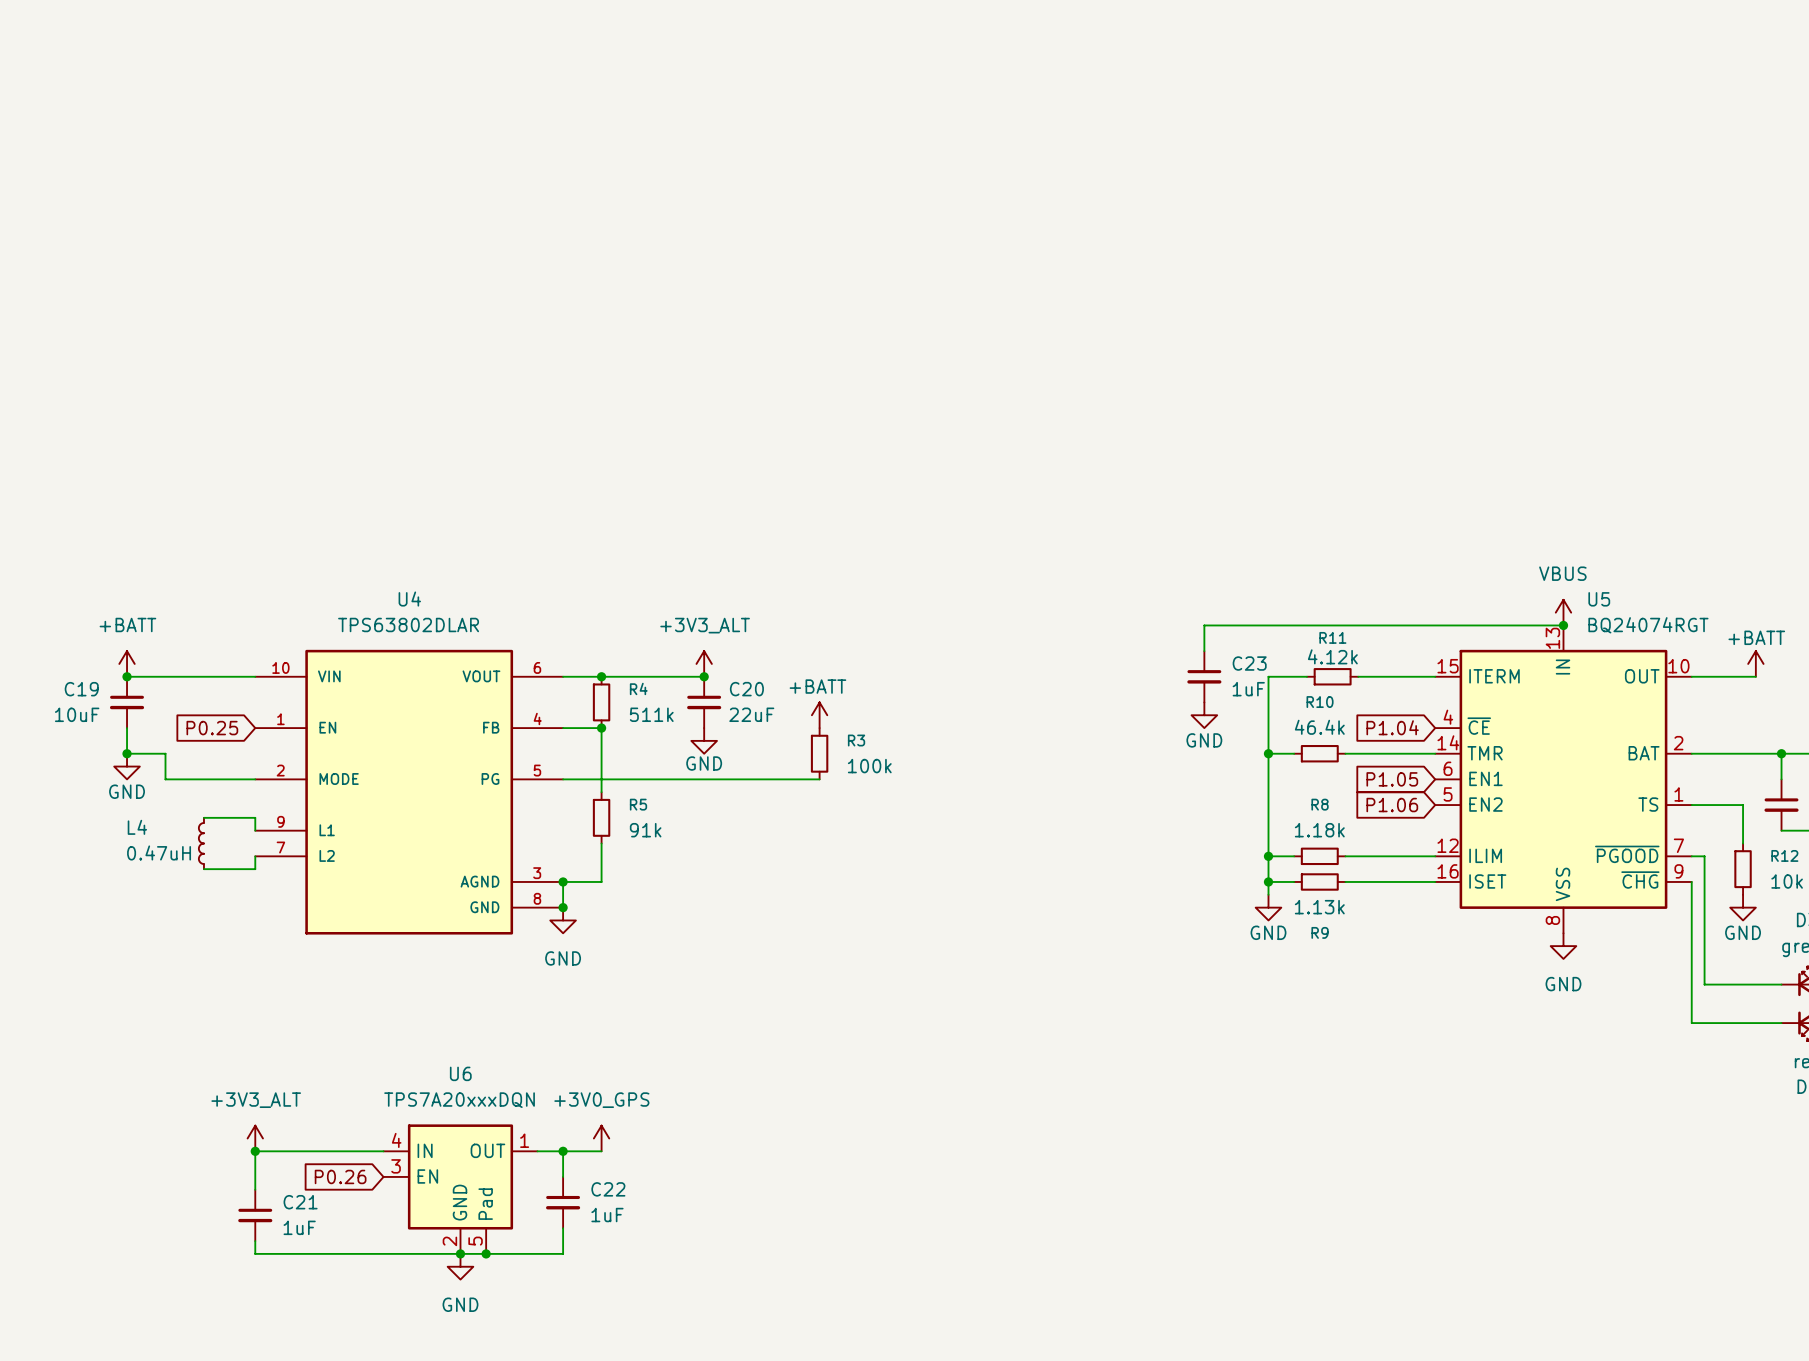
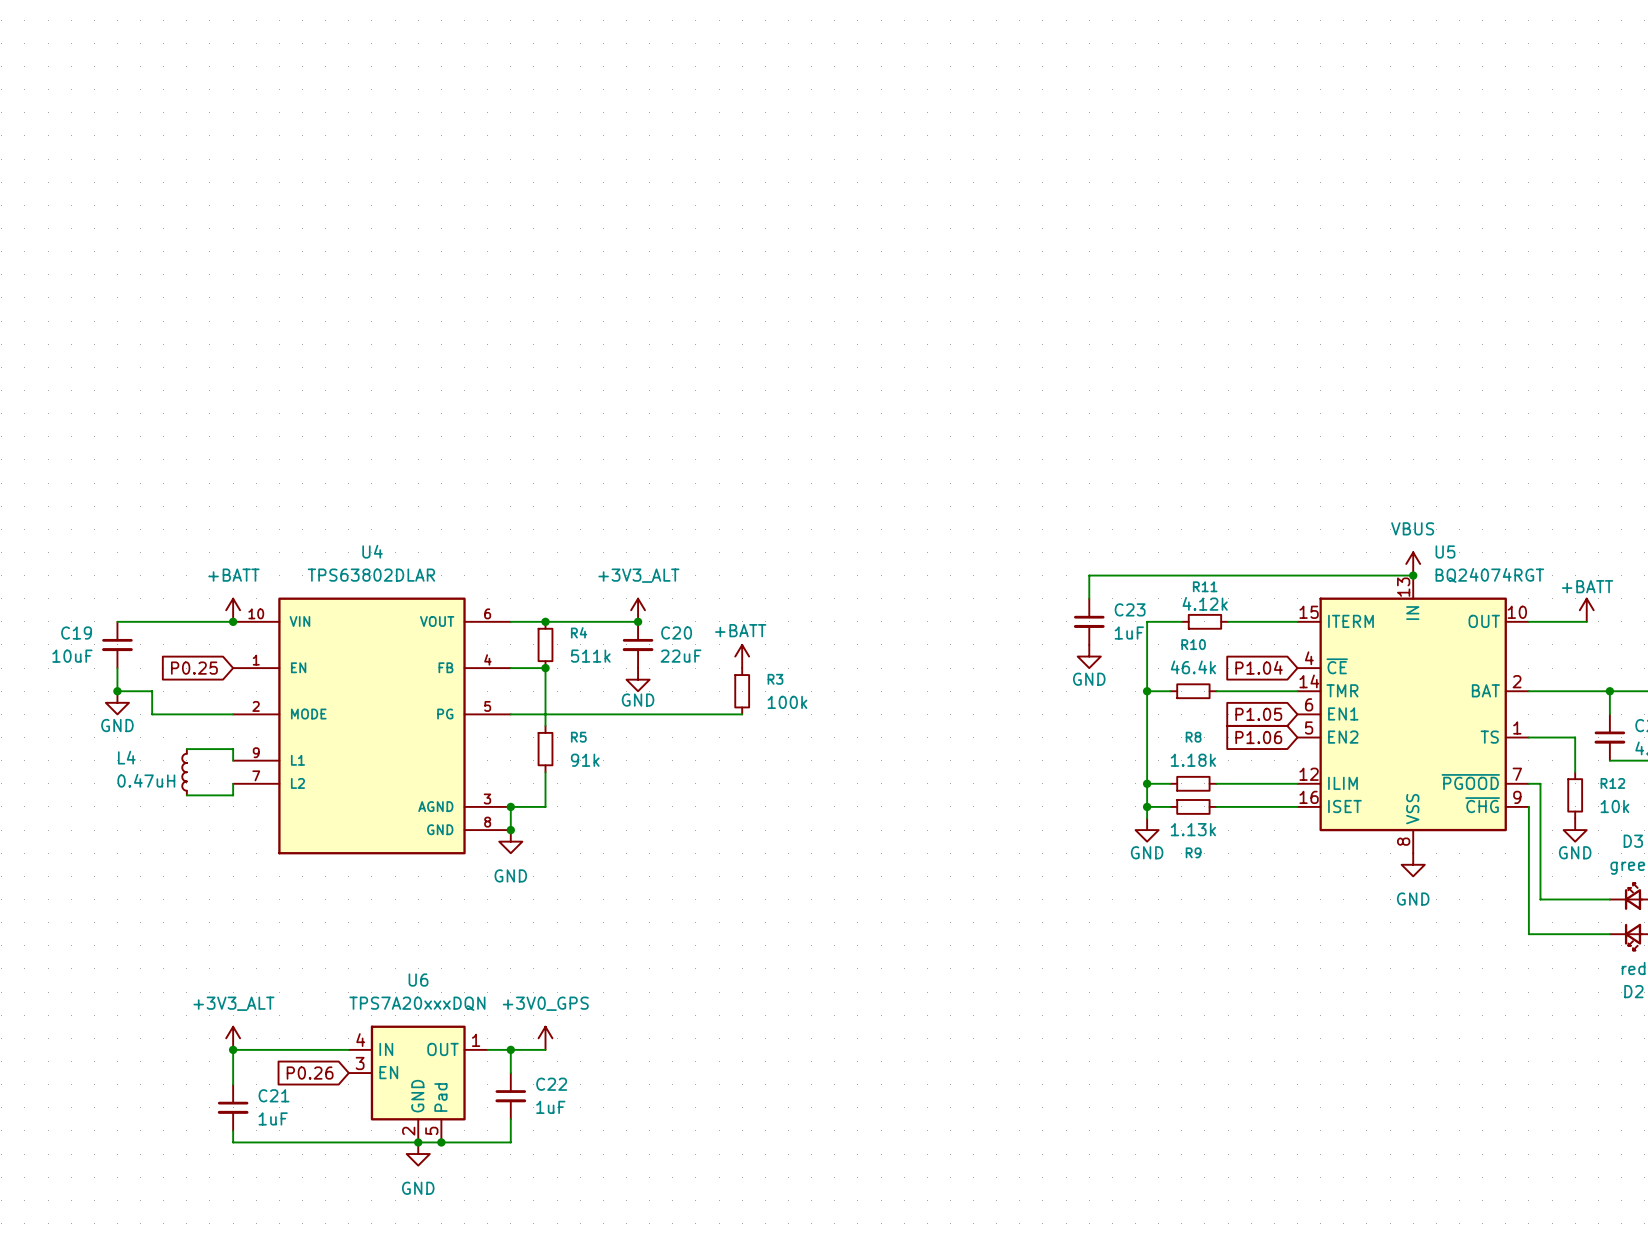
power symbol position: +BATT (127, 663) -> +BATT (233, 610)
junction: (127, 676) -> none
junction: none -> (233, 621)

